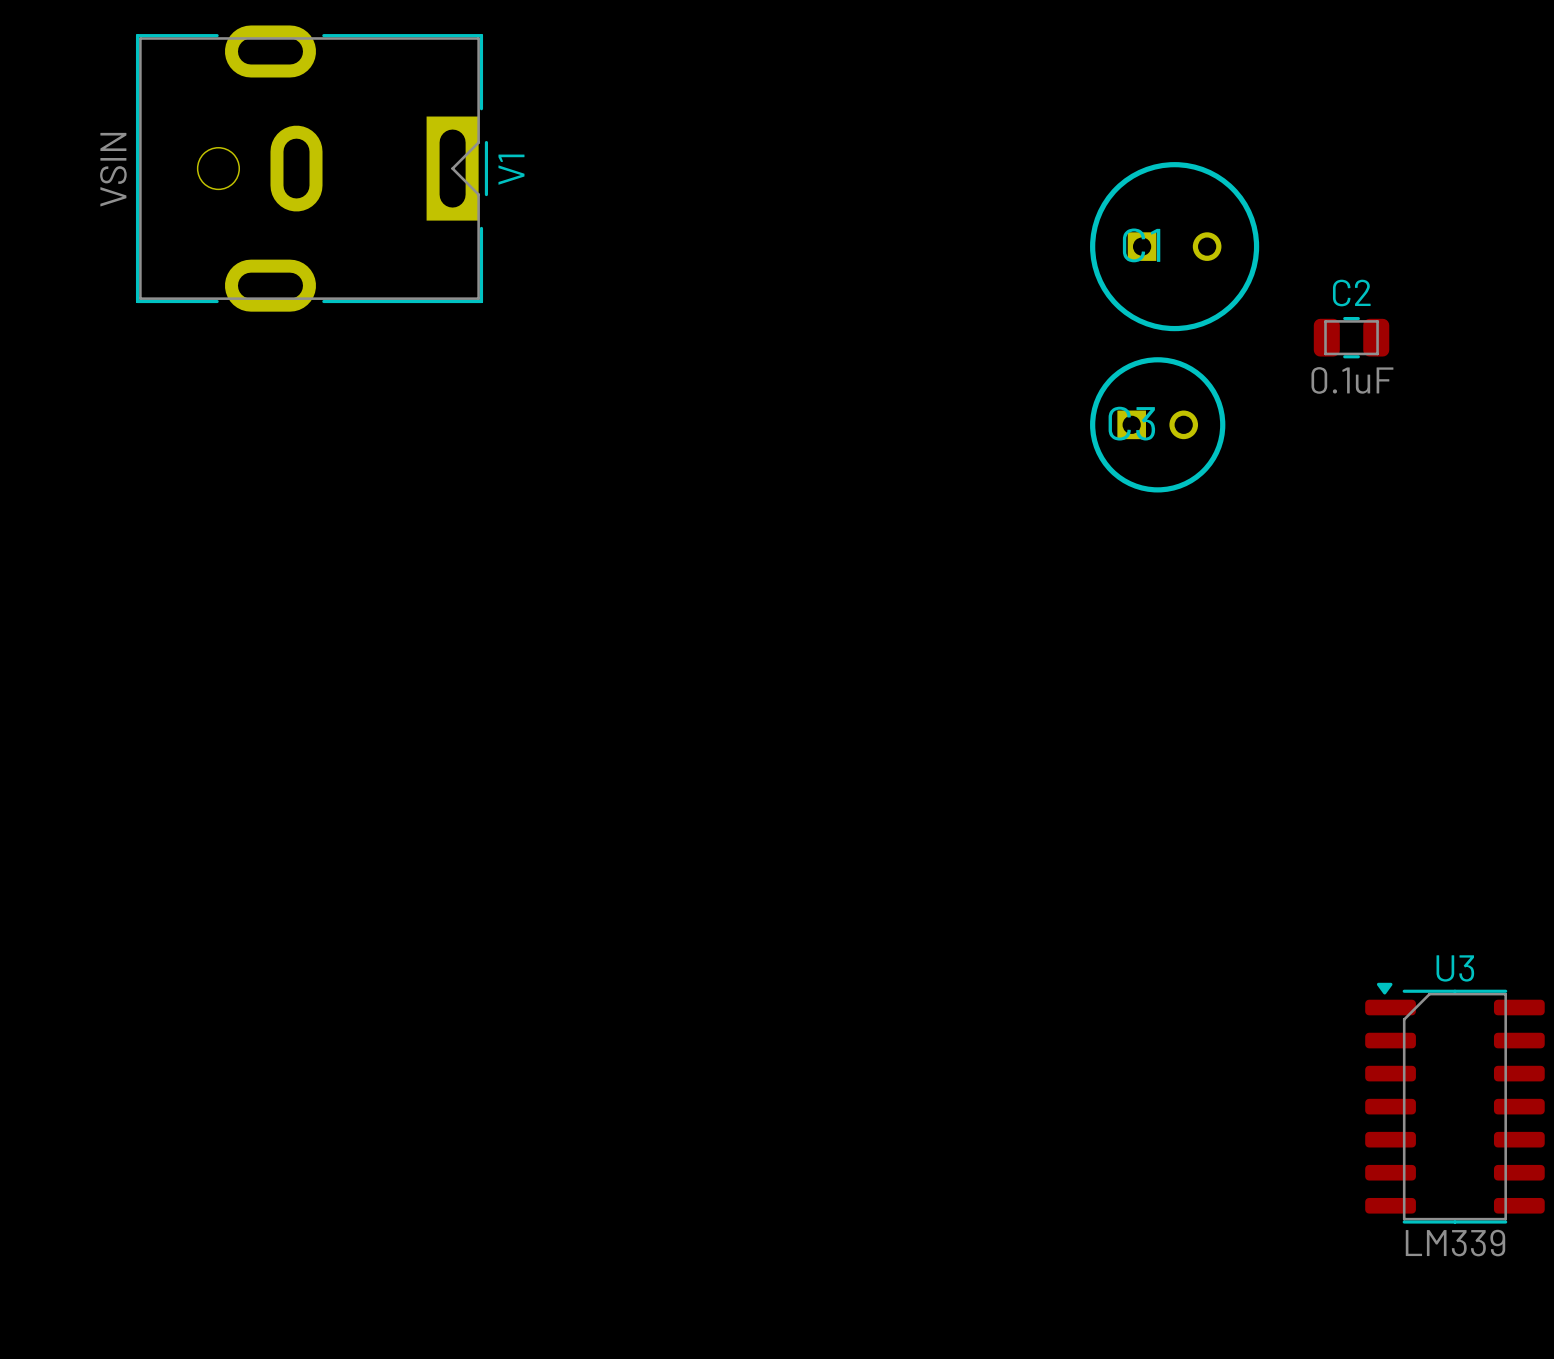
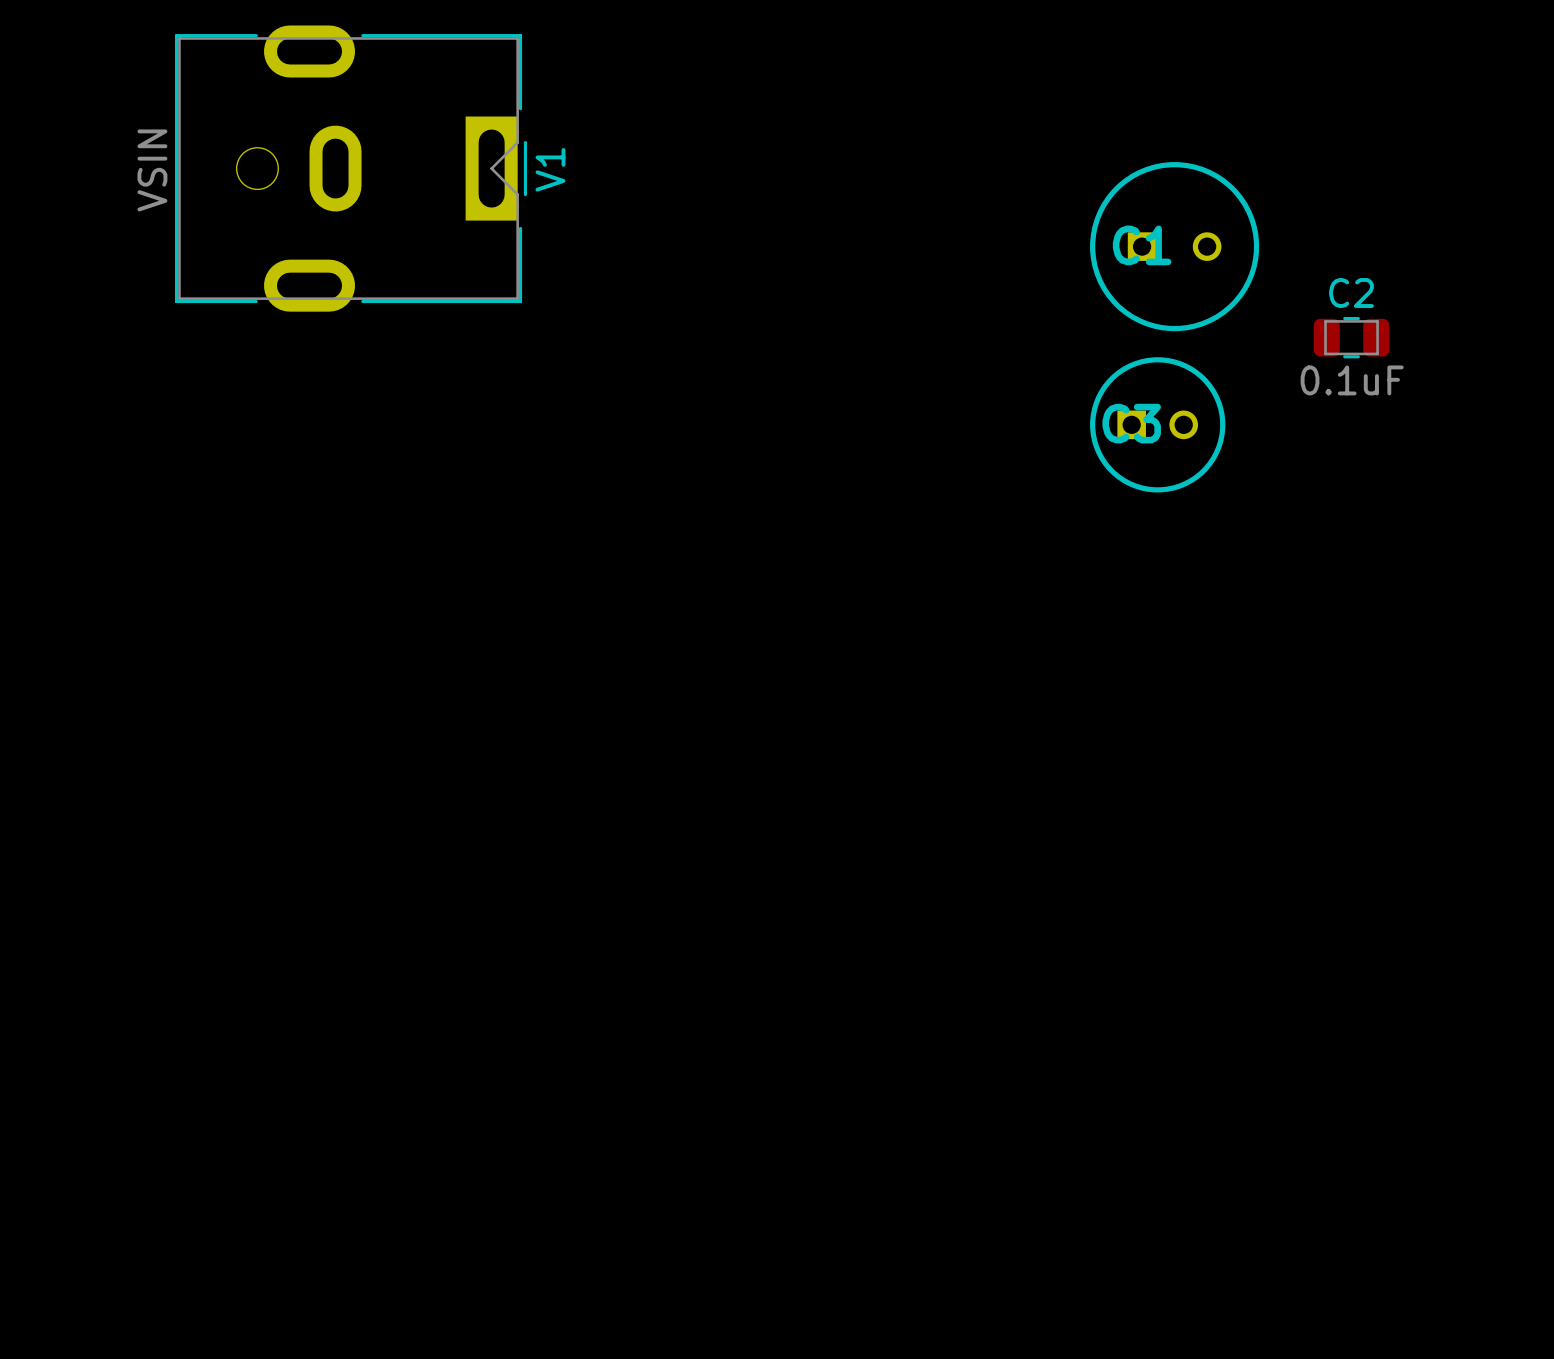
V1 position: (311, 168) -> (351, 168)
U3: LM339 (1454, 1103) -> none

